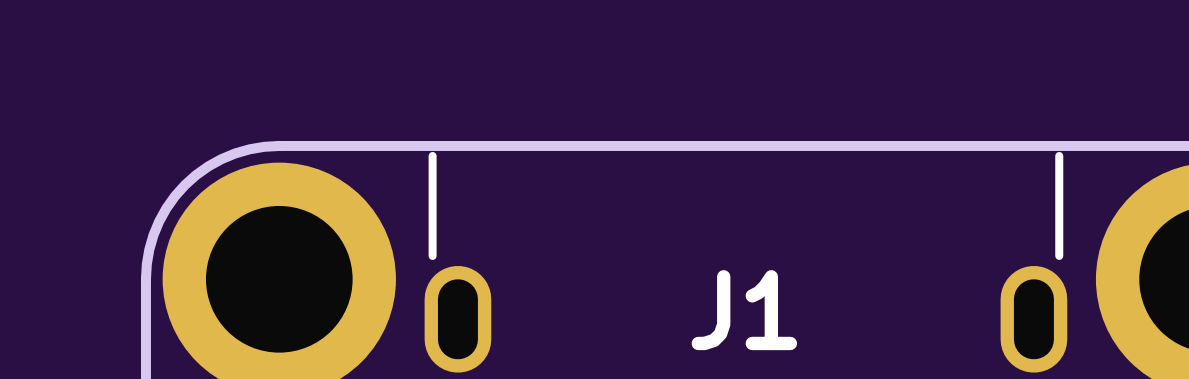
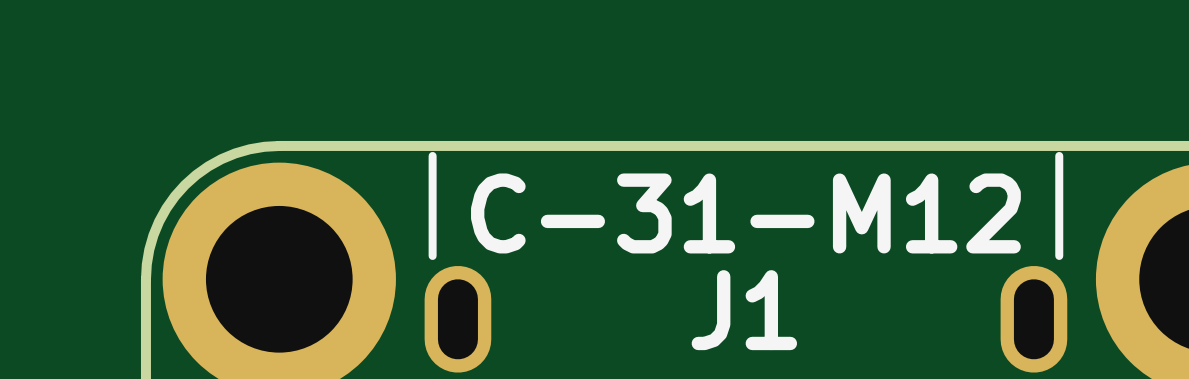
J1 value: none -> C-31-M12 (745, 213)

